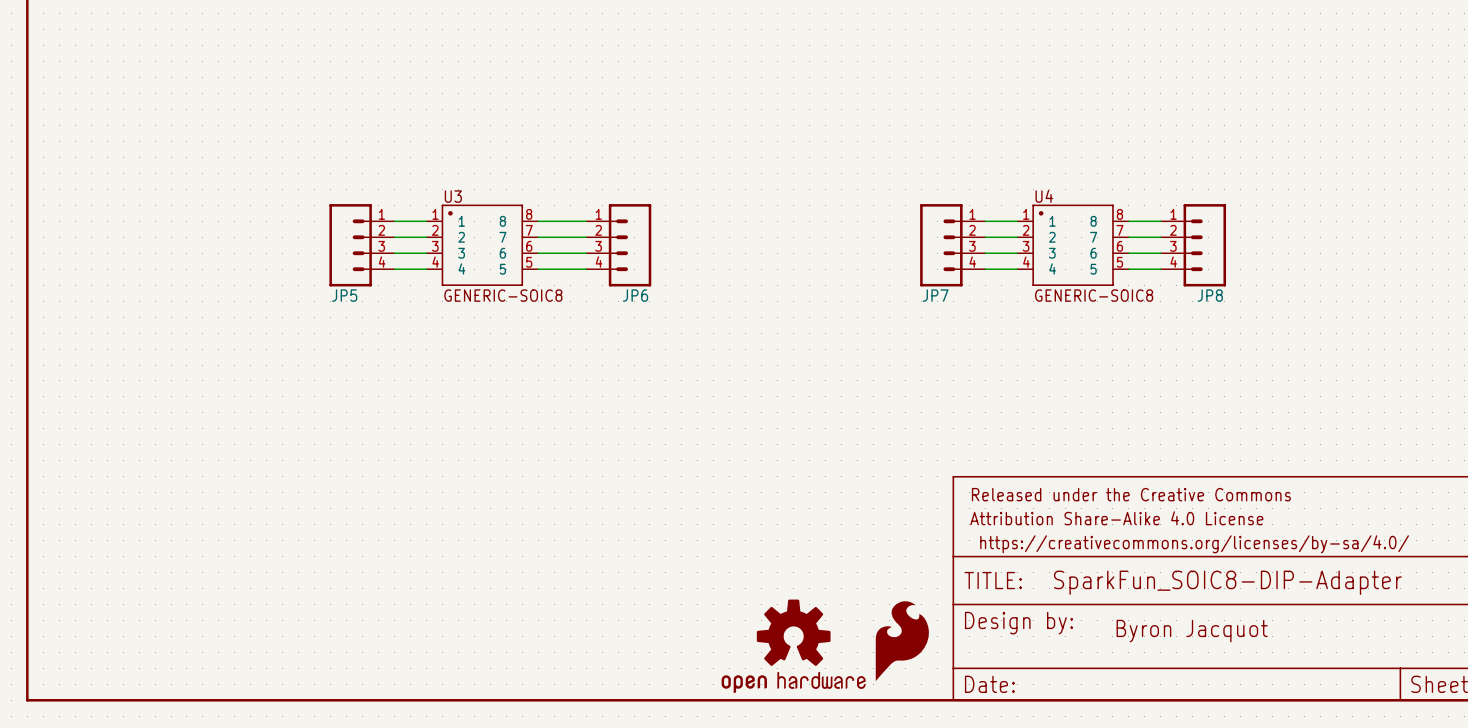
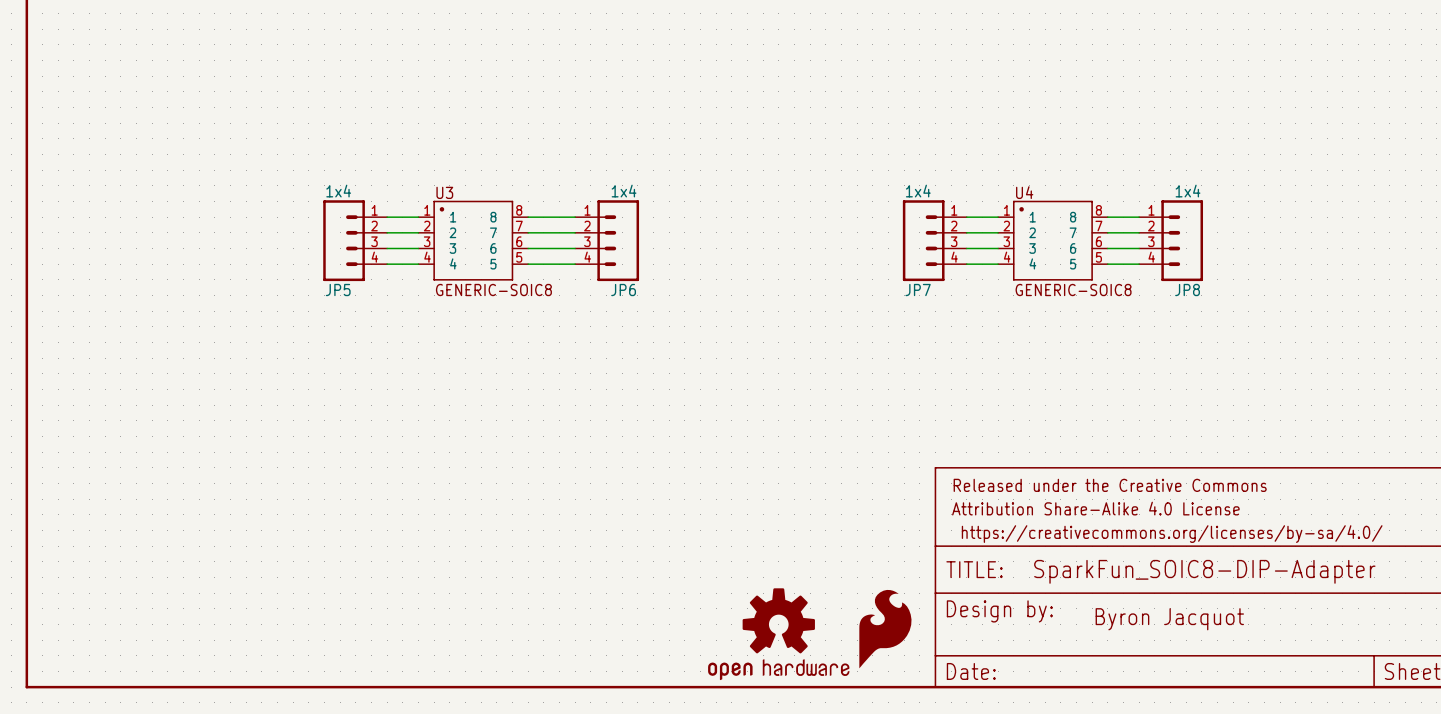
JP5 value: none -> 1x4 (338, 191)
JP6 value: none -> 1x4 (624, 191)
JP7 value: none -> 1x4 (918, 191)
JP8 value: none -> 1x4 (1188, 191)

